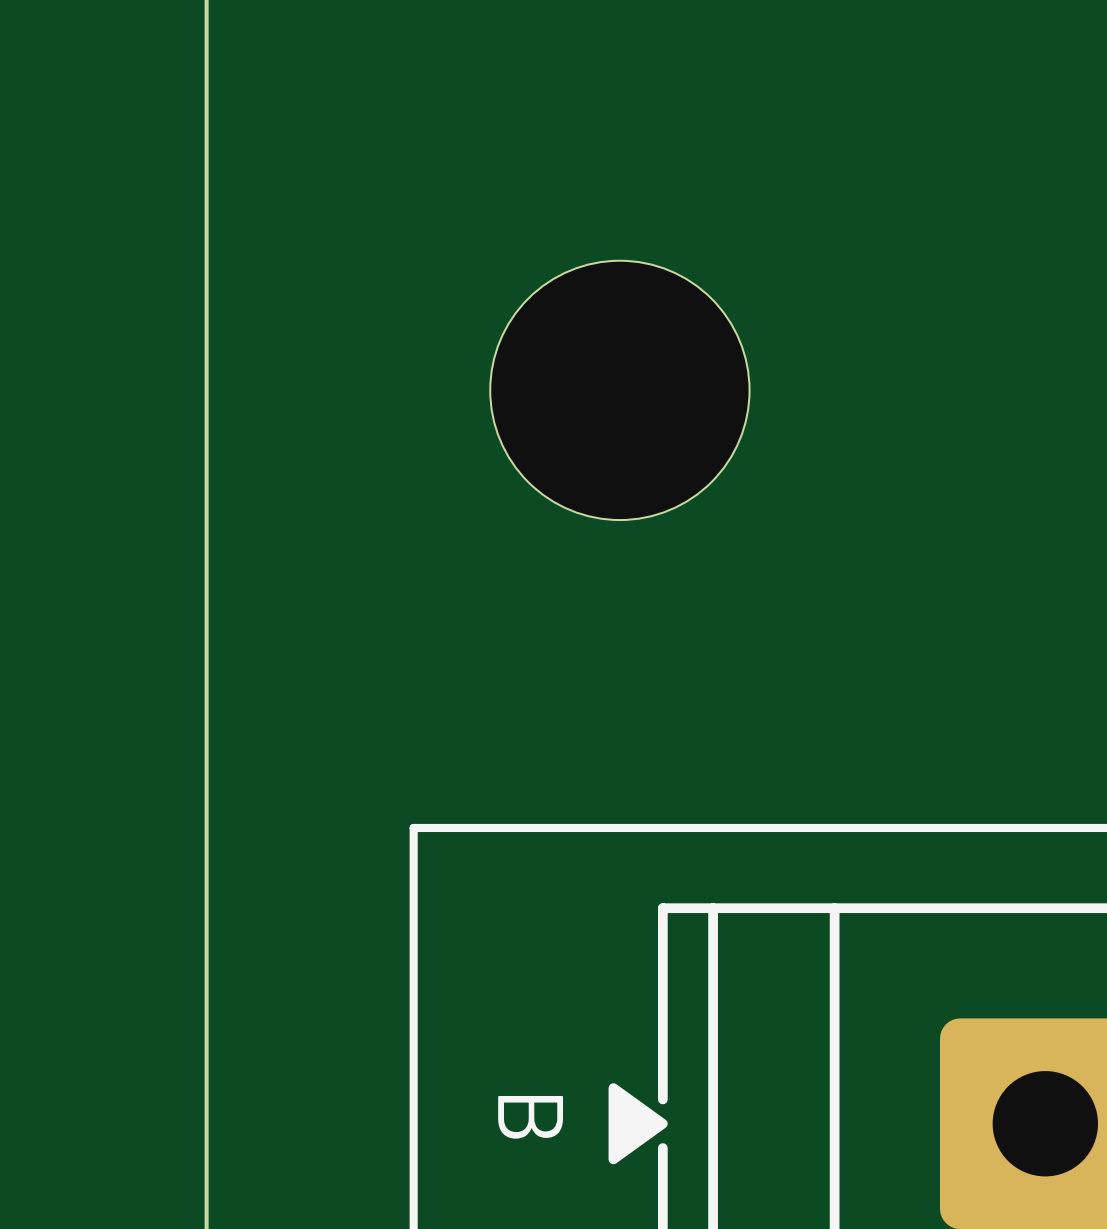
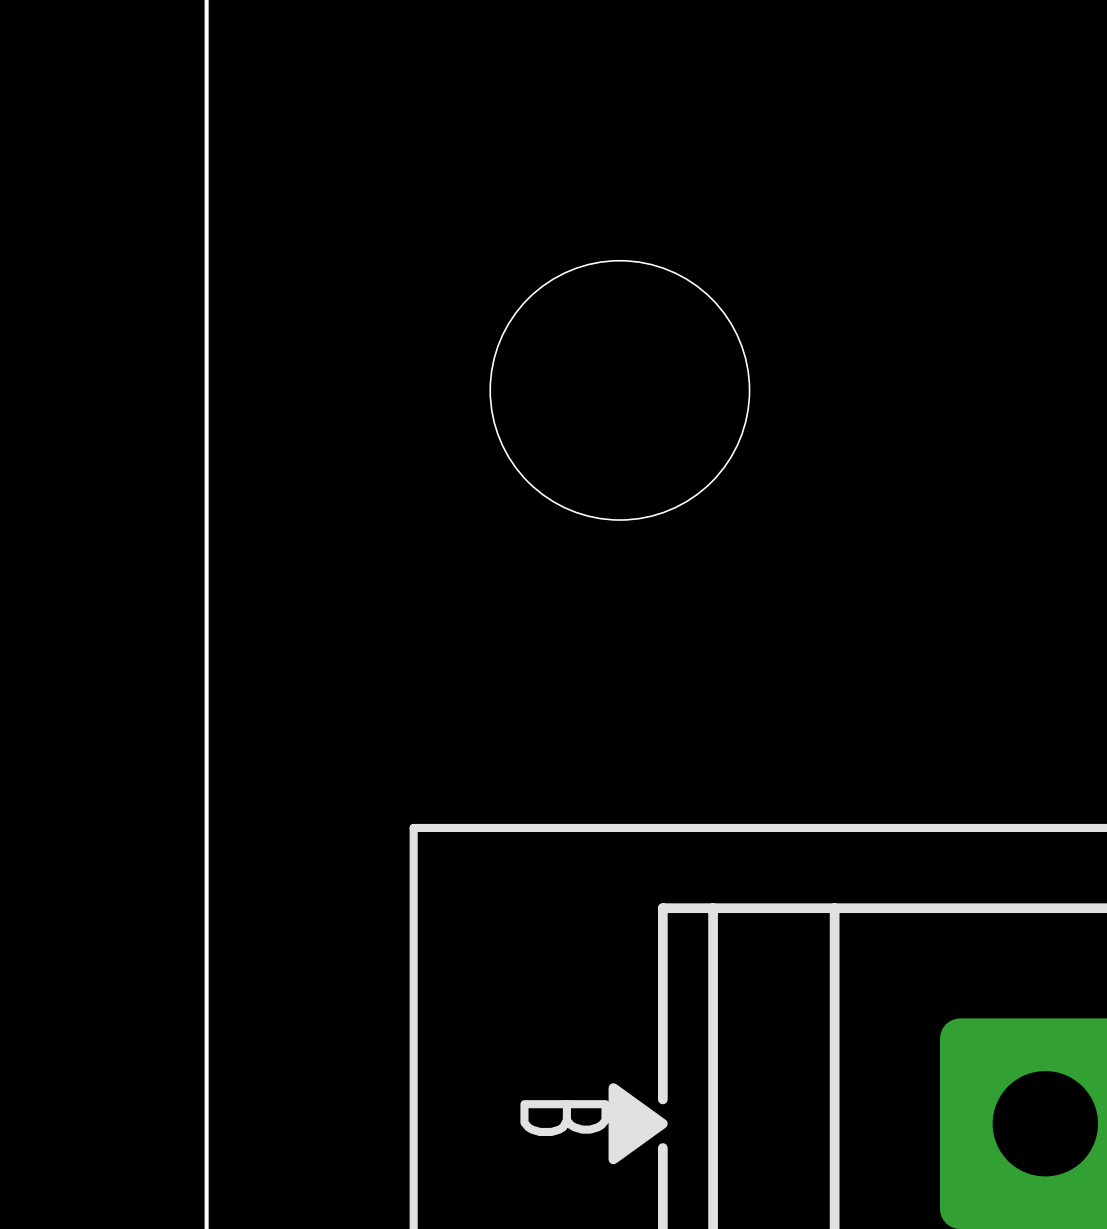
text position: B (530, 1117) -> B (564, 1118)

